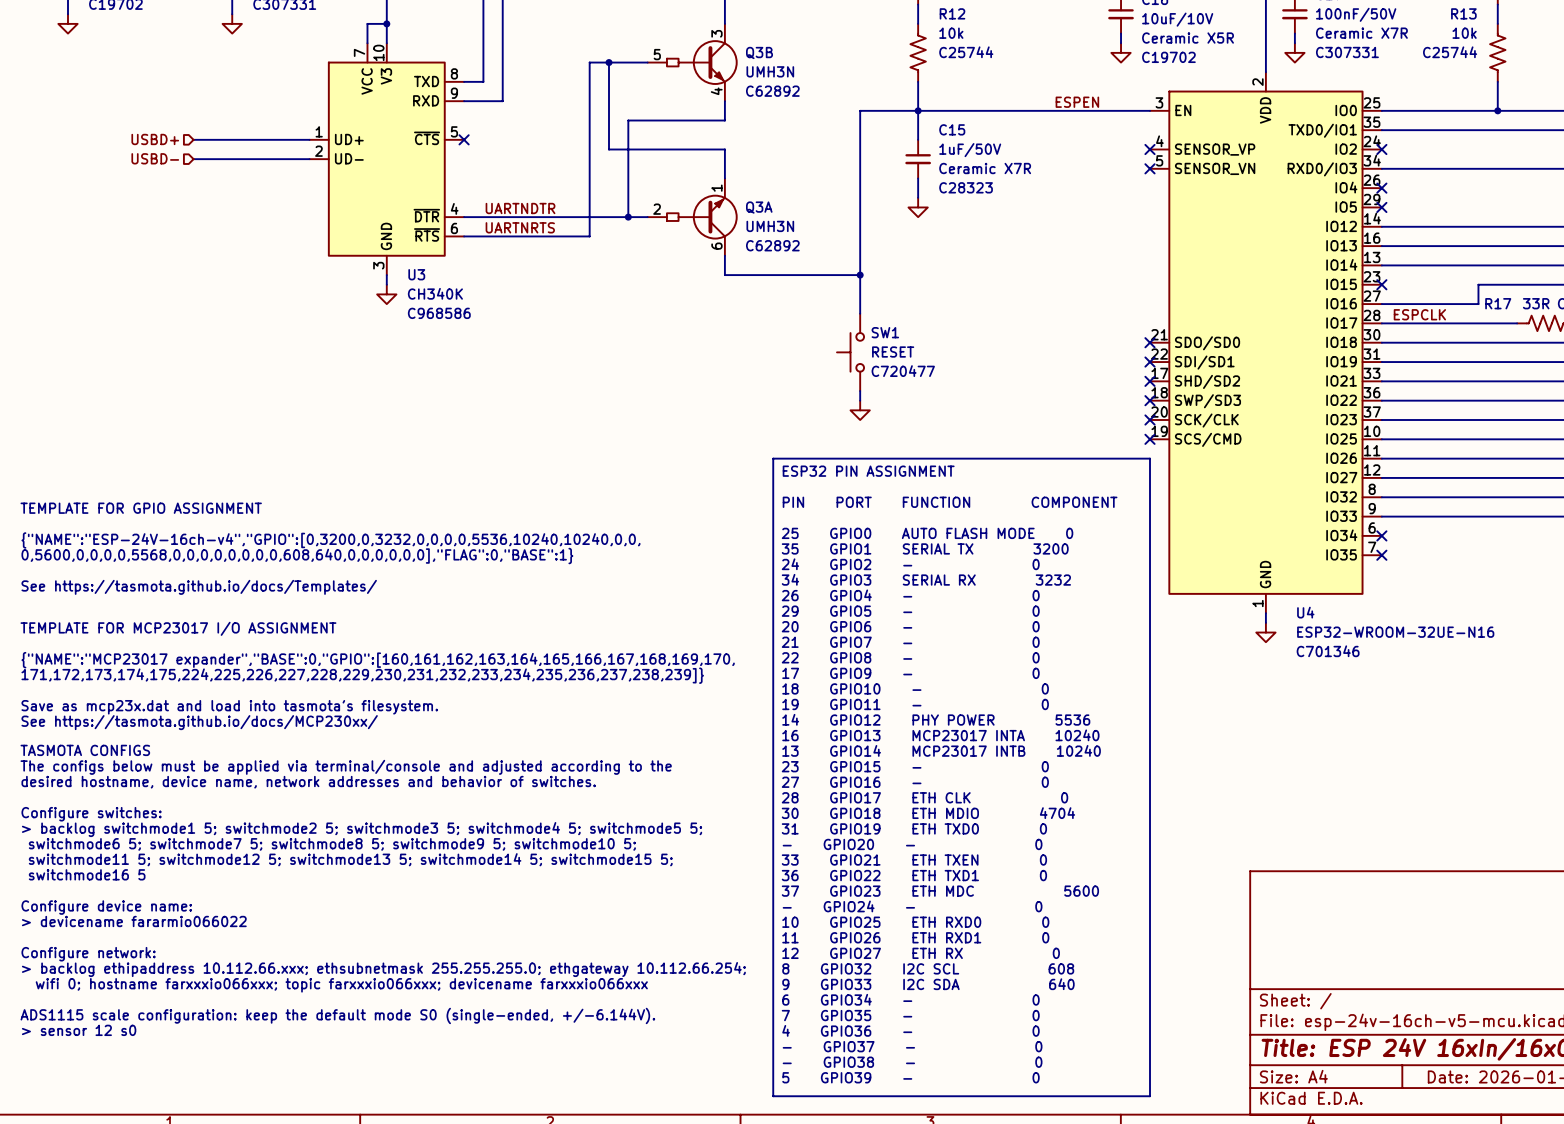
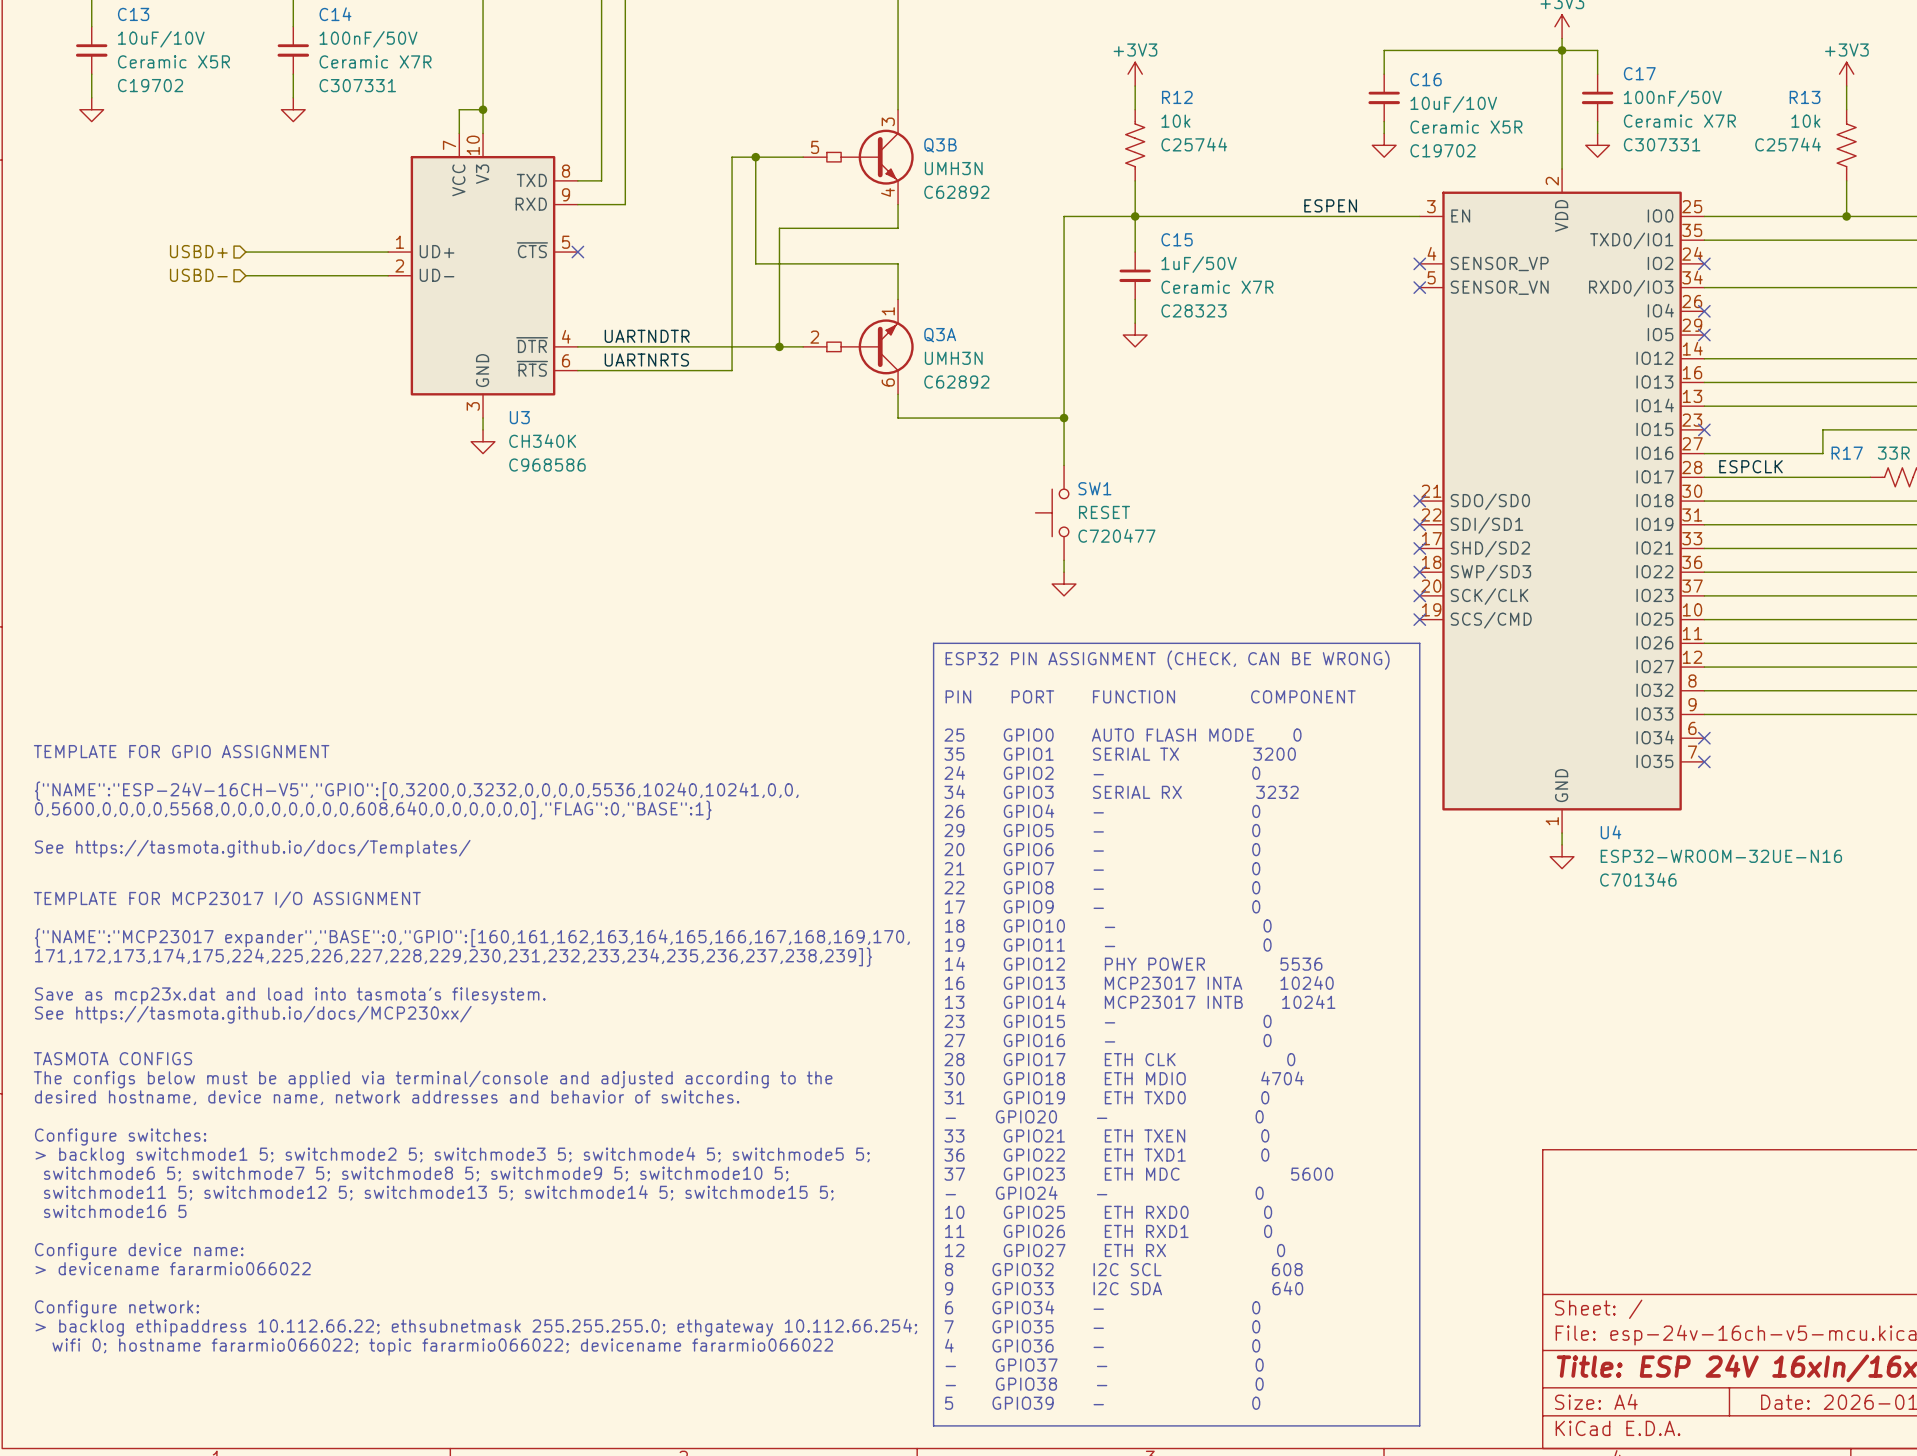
line: (773, 458) (773, 1096) -> (957, 643) (933, 643) (933, 1425) (957, 1425)
text: ESP32 PIN ASSIGNMENT (868, 471) -> ESP32 PIN ASSIGNMENT (CHECK, CAN BE WRONG) (1167, 660)
text position: PIN PORT FUNCTION COMPONENT (950, 502) -> PIN PORT FUNCTION COMPONENT (1150, 696)
text position: TEMPLATE FOR GPIO ASSIGNMENT (141, 508) -> TEMPLATE FOR GPIO ASSIGNMENT (181, 751)
text position: 25 GPIO0 AUTO FLASH MODE 0 (927, 533) -> 25 GPIO0 AUTO FLASH MODE 0 (1122, 735)
text: {"NAME":"ESP-24V-16ch-v4","GPIO":[0,3200,0,3232,0,0,0,0,5536,10240,10240,0,0, (330, 540) -> none
text position: 35 GPIO1 SERIAL TX 3200 (925, 548) -> 35 GPIO1 SERIAL TX 3200 (1120, 754)
text position: 0,5600,0,0,0,0,5568,0,0,0,0,0,0,0,0,608,640,0,0,0,0,0,0],"FLAG":0,"BASE":1} (297, 556) -> 0,5600,0,0,0,0,5568,0,0,0,0,0,0,0,0,608,640,0,0,0,0,0,0],"FLAG":0,"BASE":1} (373, 810)
text position: 24 GPIO2 - 0 (910, 564) -> 24 GPIO2 - 0 (1102, 772)
text: none -> {"NAME":"ESP-24V-16CH-V5","GPIO":[0,3200,0,3232,0,0,0,0,5536,10240,10241,0,0, (416, 791)
text position: 34 GPIO3 SERIAL RX 3232 (926, 579) -> 34 GPIO3 SERIAL RX 3232 (1121, 792)
text position: See https://tasmota.github.io/docs/Templates/ (199, 587) -> See https://tasmota.github.io/docs/Templates/ (252, 848)
text position: 26 GPIO4 - 0 (910, 595) -> 26 GPIO4 - 0 (1102, 811)
text position: 29 GPIO5 - 0 (910, 611) -> 29 GPIO5 - 0 (1102, 830)
text position: 20 GPIO6 - 0 (910, 626) -> 20 GPIO6 - 0 (1102, 849)
text position: TEMPLATE FOR MCP23017 I/O ASSIGNMENT (178, 628) -> TEMPLATE FOR MCP23017 I/O ASSIGNMENT (227, 899)
text position: 21 GPIO7 - 0 (910, 642) -> 21 GPIO7 - 0 (1102, 868)
text position: 22 GPIO8 - 0 (910, 657) -> 22 GPIO8 - 0 (1102, 887)
text position: {"NAME":"MCP23017 expander","BASE":0,"GPIO":[160,161,162,163,164,165,166,167,168,169,170, (378, 660) -> {"NAME":"MCP23017 expander","BASE":0,"GPIO":[160,161,162,163,164,165,166,167,168,169,170, (472, 938)
text position: 17 GPIO9 - 0 (910, 673) -> 17 GPIO9 - 0 (1102, 906)
text position: 171,172,173,174,175,224,225,226,227,228,229,230,231,232,233,234,235,236,237,238,239]} (362, 675) -> 171,172,173,174,175,224,225,226,227,228,229,230,231,232,233,234,235,236,237,238,239]} (453, 957)
text position: 18 GPIO10 - 0 (915, 688) -> 18 GPIO10 - 0 (1108, 925)
text position: 19 GPIO11 - 0 (915, 704) -> 19 GPIO11 - 0 (1108, 945)
text position: Save as mcp23x.dat and load into tasmota's filesystem. (229, 707) -> Save as mcp23x.dat and load into tasmota's filesystem. (290, 995)
text position: 14 GPIO12 PHY POWER 5536 (936, 719) -> 14 GPIO12 PHY POWER 5536 (1133, 963)
text position: See https://tasmota.github.io/docs/MCP230xx/ (199, 722) -> See https://tasmota.github.io/docs/MCP230xx/ (253, 1014)
text position: 16 GPIO13 MCP23017 INTA 10240 (940, 735) -> 16 GPIO13 MCP23017 INTA 10240 (1139, 982)
text position: TASMOTA CONFIGS (85, 750) -> TASMOTA CONFIGS (112, 1058)
text: 13 GPIO14 MCP23017 INTB 10240 (941, 750) -> 13 GPIO14 MCP23017 INTB 10241 (1140, 1002)
text position: 23 GPIO15 - 0 (915, 766) -> 23 GPIO15 - 0 (1108, 1021)
text: The configs below must be applied via terminal/console and adjusted according to the (346, 767) -> none
text: desired hostname, device name, network addresses and behavior of switches. (308, 782) -> none
text position: 27 GPIO16 - 0 (915, 782) -> 27 GPIO16 - 0 (1108, 1040)
text position: 28 GPIO17 ETH CLK 0 (925, 797) -> 28 GPIO17 ETH CLK 0 (1119, 1059)
text position: 30 GPIO18 ETH MDIO 4704 (928, 813) -> 30 GPIO18 ETH MDIO 4704 (1124, 1078)
text: Configure switches: (91, 814) -> The configs below must be applied via terminal/console and adjusted according to the (433, 1079)
text position: 31 GPIO19 ETH TXD0 0 (914, 828) -> 31 GPIO19 ETH TXD0 0 (1106, 1097)
text: > backlog switchmode1 5; switchmode2 5; switchmode3 5; switchmode4 5; switchmode5 5; (362, 829) -> desired hostname, device name, network addresses and behavior of switches. (387, 1097)
text position: switchmode6 5; switchmode7 5; switchmode8 5; switchmode9 5; switchmode10 5; (332, 844) -> switchmode6 5; switchmode7 5; switchmode8 5; switchmode9 5; switchmode10 5; (416, 1174)
text position: - GPIO20 - 0 (912, 844) -> - GPIO20 - 0 (1104, 1116)
text: switchmode11 5; switchmode12 5; switchmode13 5; switchmode14 5; switchmode15 5; (350, 859) -> Configure switches: (120, 1137)
text position: 33 GPIO21 ETH TXEN 0 (914, 860) -> 33 GPIO21 ETH TXEN 0 (1106, 1135)
text: switchmode16 5 (87, 874) -> > backlog switchmode1 5; switchmode2 5; switchmode3 5; switchmode4 5; switchmode5 5; (452, 1155)
text position: 36 GPIO22 ETH TXD1 0 (914, 875) -> 36 GPIO22 ETH TXD1 0 (1106, 1155)
text position: 37 GPIO23 ETH MDC 5600 (940, 891) -> 37 GPIO23 ETH MDC 5600 (1138, 1174)
text position: - GPIO24 - 0 (912, 906) -> - GPIO24 - 0 (1104, 1192)
text: Configure device name: (106, 907) -> switchmode11 5; switchmode12 5; switchmode13 5; switchmode14 5; switchmode15 5; (438, 1192)
text: > devicename fararmio066022 (134, 921) -> switchmode16 5 (115, 1211)
text position: 10 GPIO25 ETH RXD0 0 (915, 922) -> 10 GPIO25 ETH RXD0 0 (1108, 1212)
text position: 11 GPIO26 ETH RXD1 0 (915, 937) -> 11 GPIO26 ETH RXD1 0 (1108, 1231)
text position: 12 GPIO27 ETH RX 0 (921, 953) -> 12 GPIO27 ETH RX 0 (1115, 1250)
text: Configure network: (88, 954) -> Configure device name: (139, 1251)
text position: 8 GPIO32 I2C SCL 608 (928, 968) -> 8 GPIO32 I2C SCL 608 (1123, 1269)
text: > backlog ethipaddress 10.112.66.xxx; ethsubnetmask 255.255.255.0; ethgateway 10.112.66.254; (383, 969) -> > devicename fararmio066022 (173, 1268)
text position: 9 GPIO33 I2C SDA 640 (928, 984) -> 9 GPIO33 I2C SDA 640 (1124, 1288)
text: wifi 0; hostname farxxxio066xxx; topic farxxxio066xxx; devicename farxxxio066xxx (341, 985) -> none
text position: 6 GPIO34 - 0 (910, 999) -> 6 GPIO34 - 0 (1102, 1307)
text: none -> Configure network: (116, 1308)
text: ADS1115 scale configuration: keep the default mode S0 (single-ended, +/-6.144V). (337, 1015) -> > backlog ethipaddress 10.112.66.22; ethsubnetmask 255.255.255.0; ethgateway 10.112.66.254; (476, 1327)
text position: 7 GPIO35 - 0 (910, 1015) -> 7 GPIO35 - 0 (1102, 1326)
text: > sensor 12 s0 (79, 1030) -> wifi 0; hostname fararmio066022; topic fararmio066022; devicename fararmio066022 (442, 1347)
text position: 4 GPIO36 - 0 (910, 1030) -> 4 GPIO36 - 0 (1102, 1345)
text position: - GPIO37 - 0 (912, 1046) -> - GPIO37 - 0 (1104, 1365)
text position: - GPIO38 - 0 (912, 1062) -> - GPIO38 - 0 (1104, 1384)
text position: 5 GPIO39 - 0 (910, 1077) -> 5 GPIO39 - 0 (1102, 1403)

